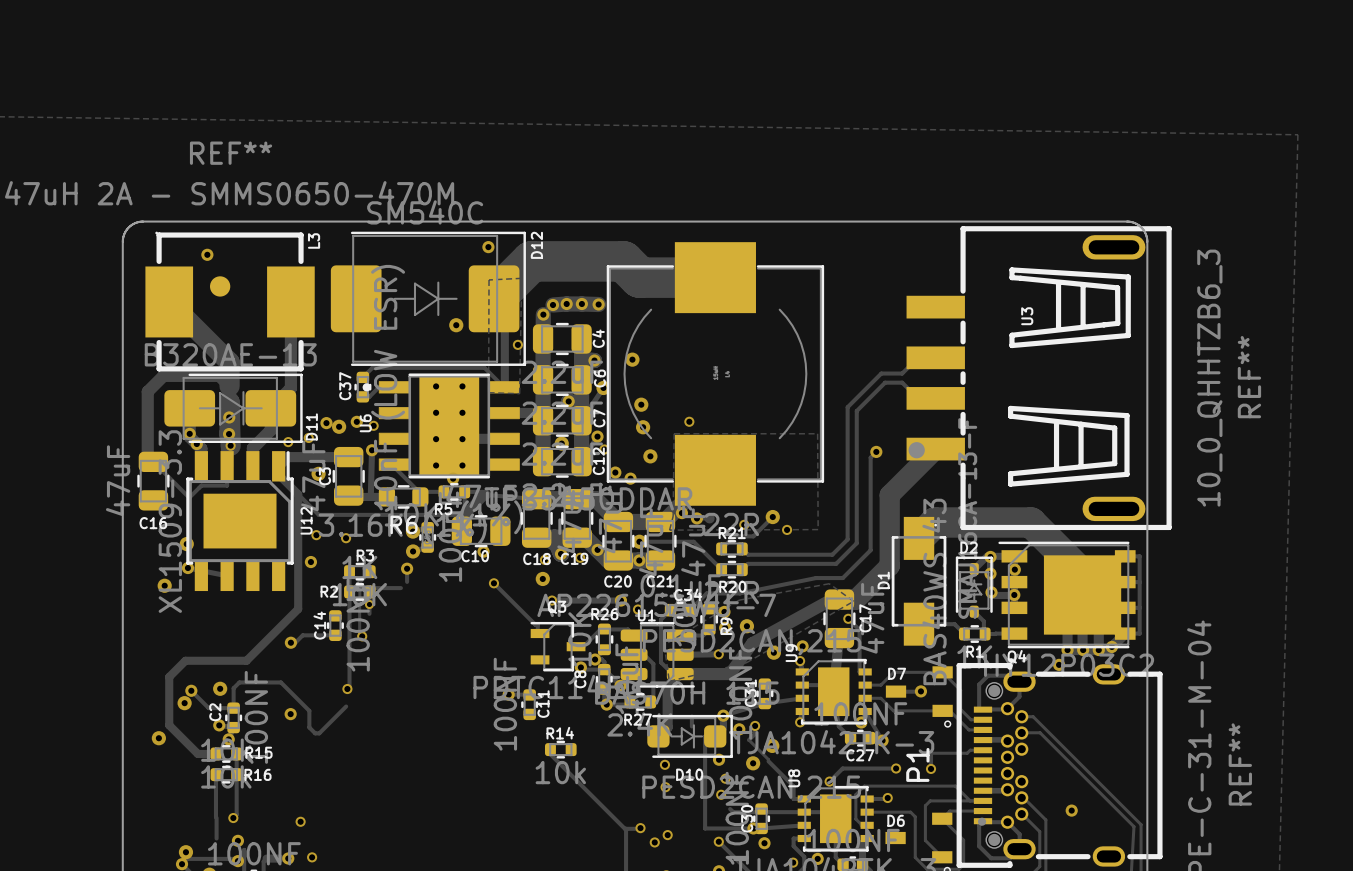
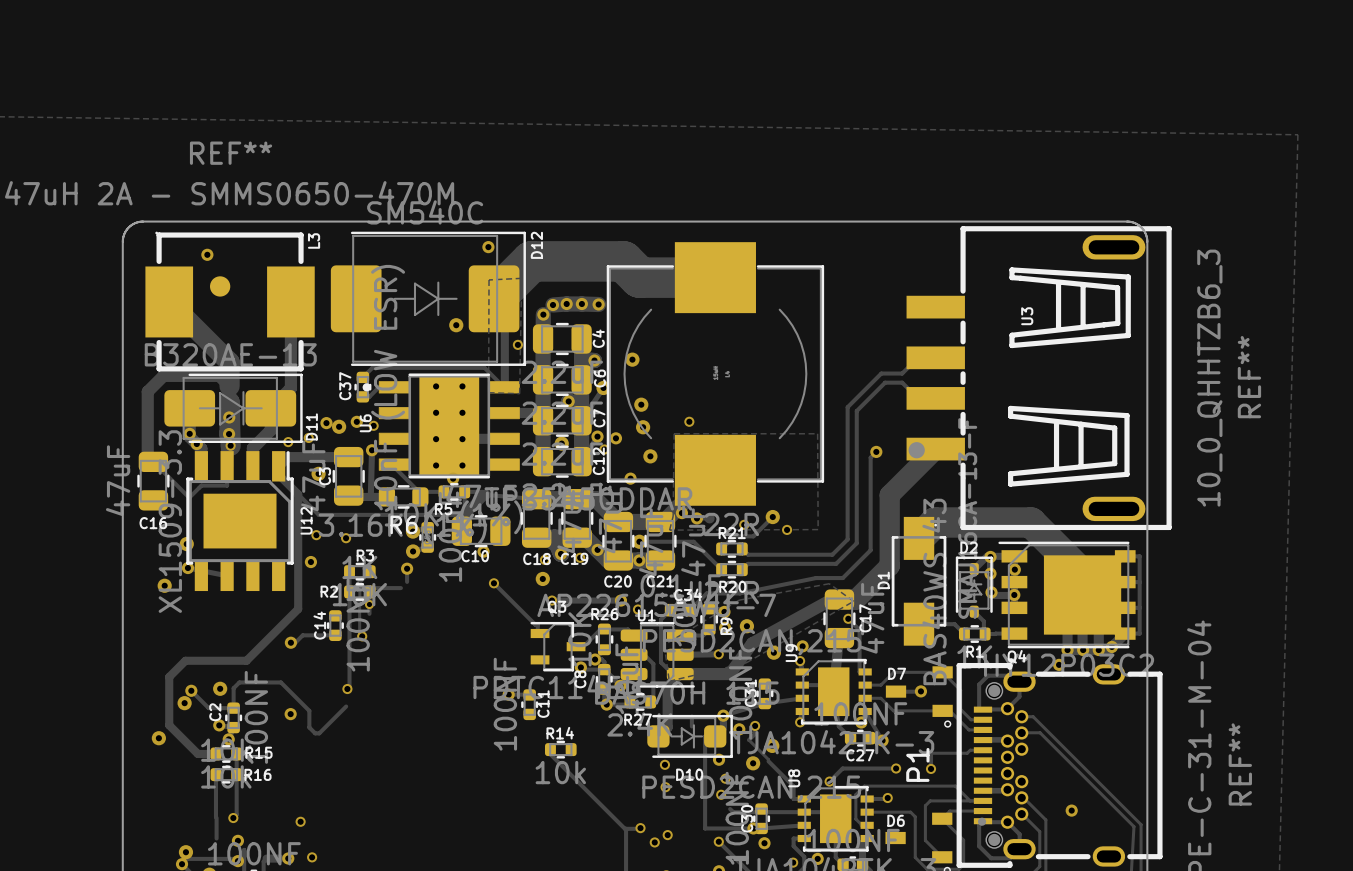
via position: (615, 472) -> (615, 438)

